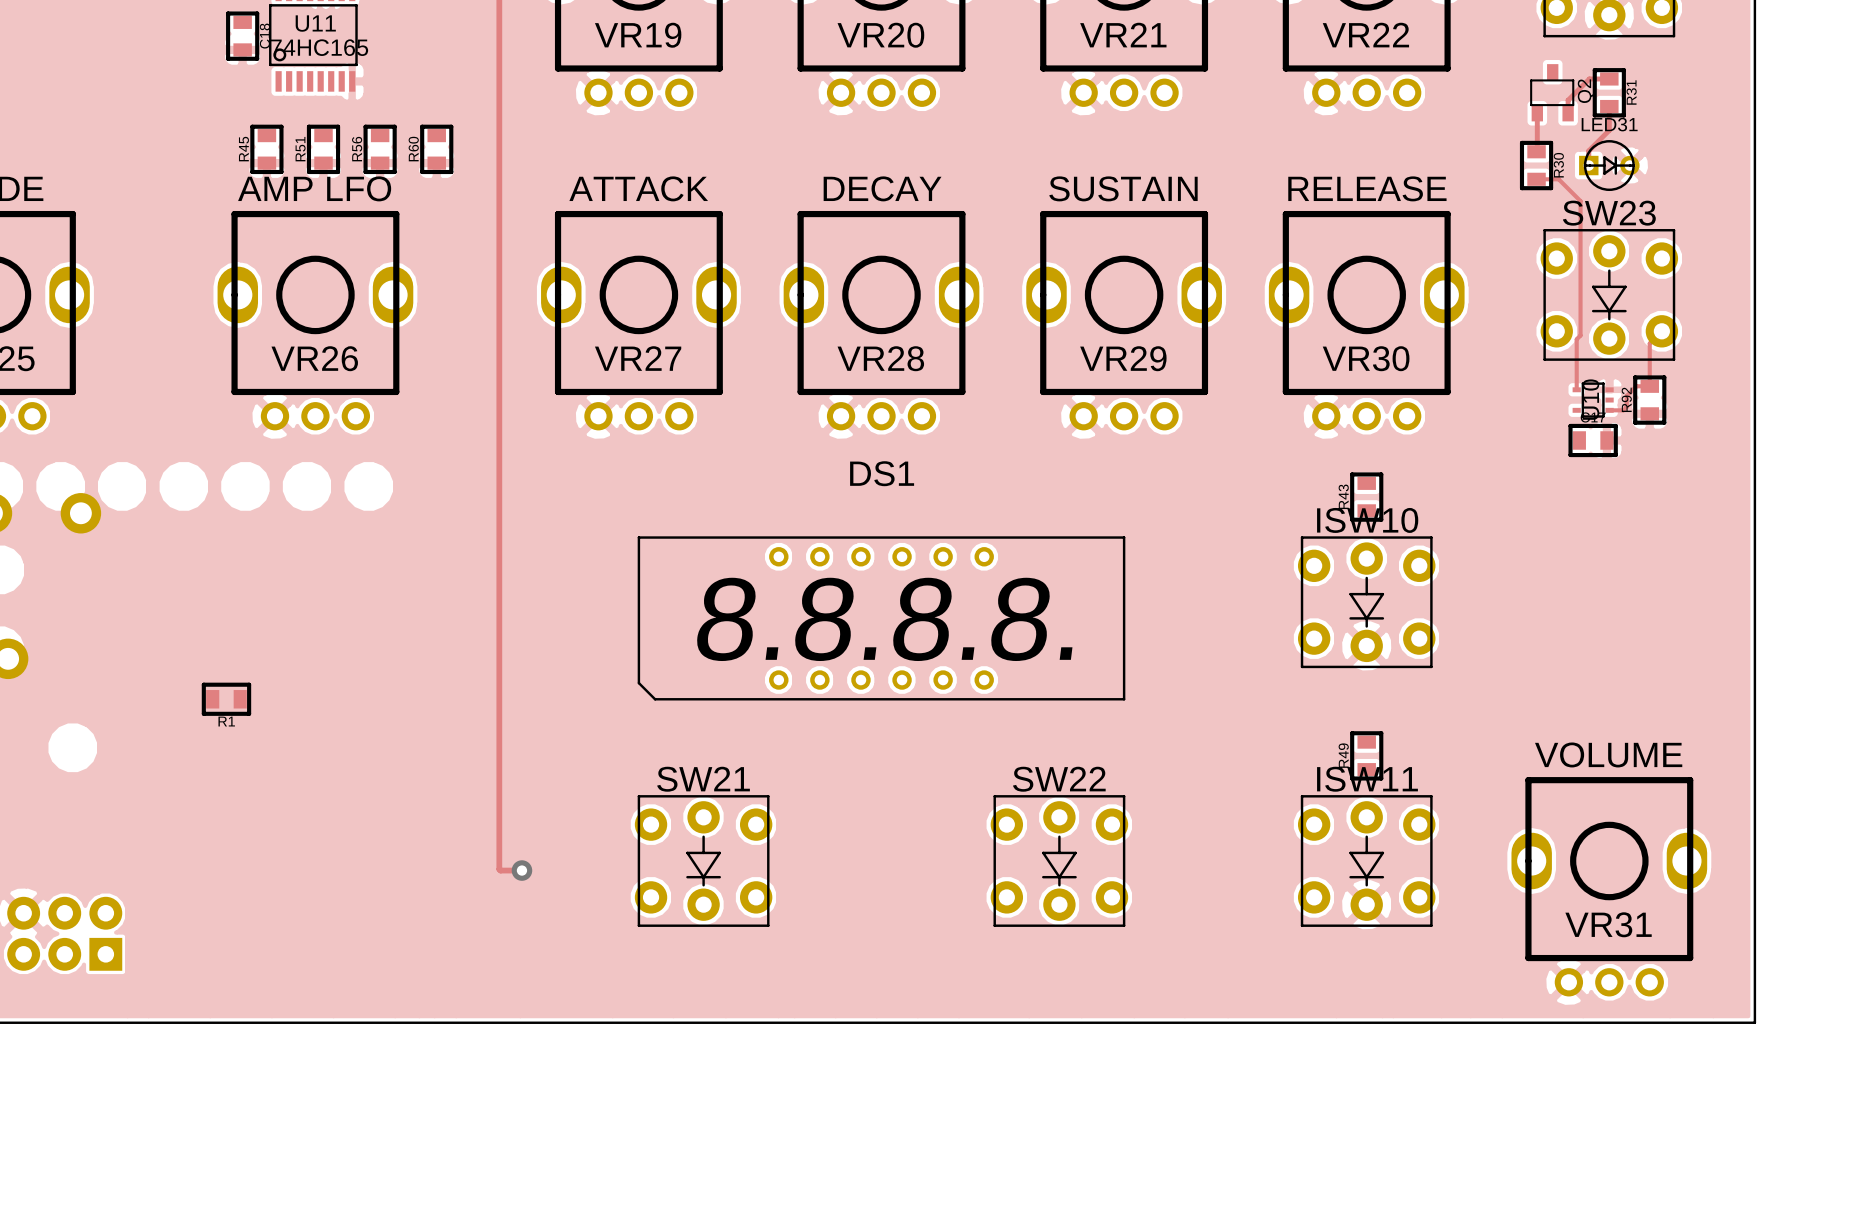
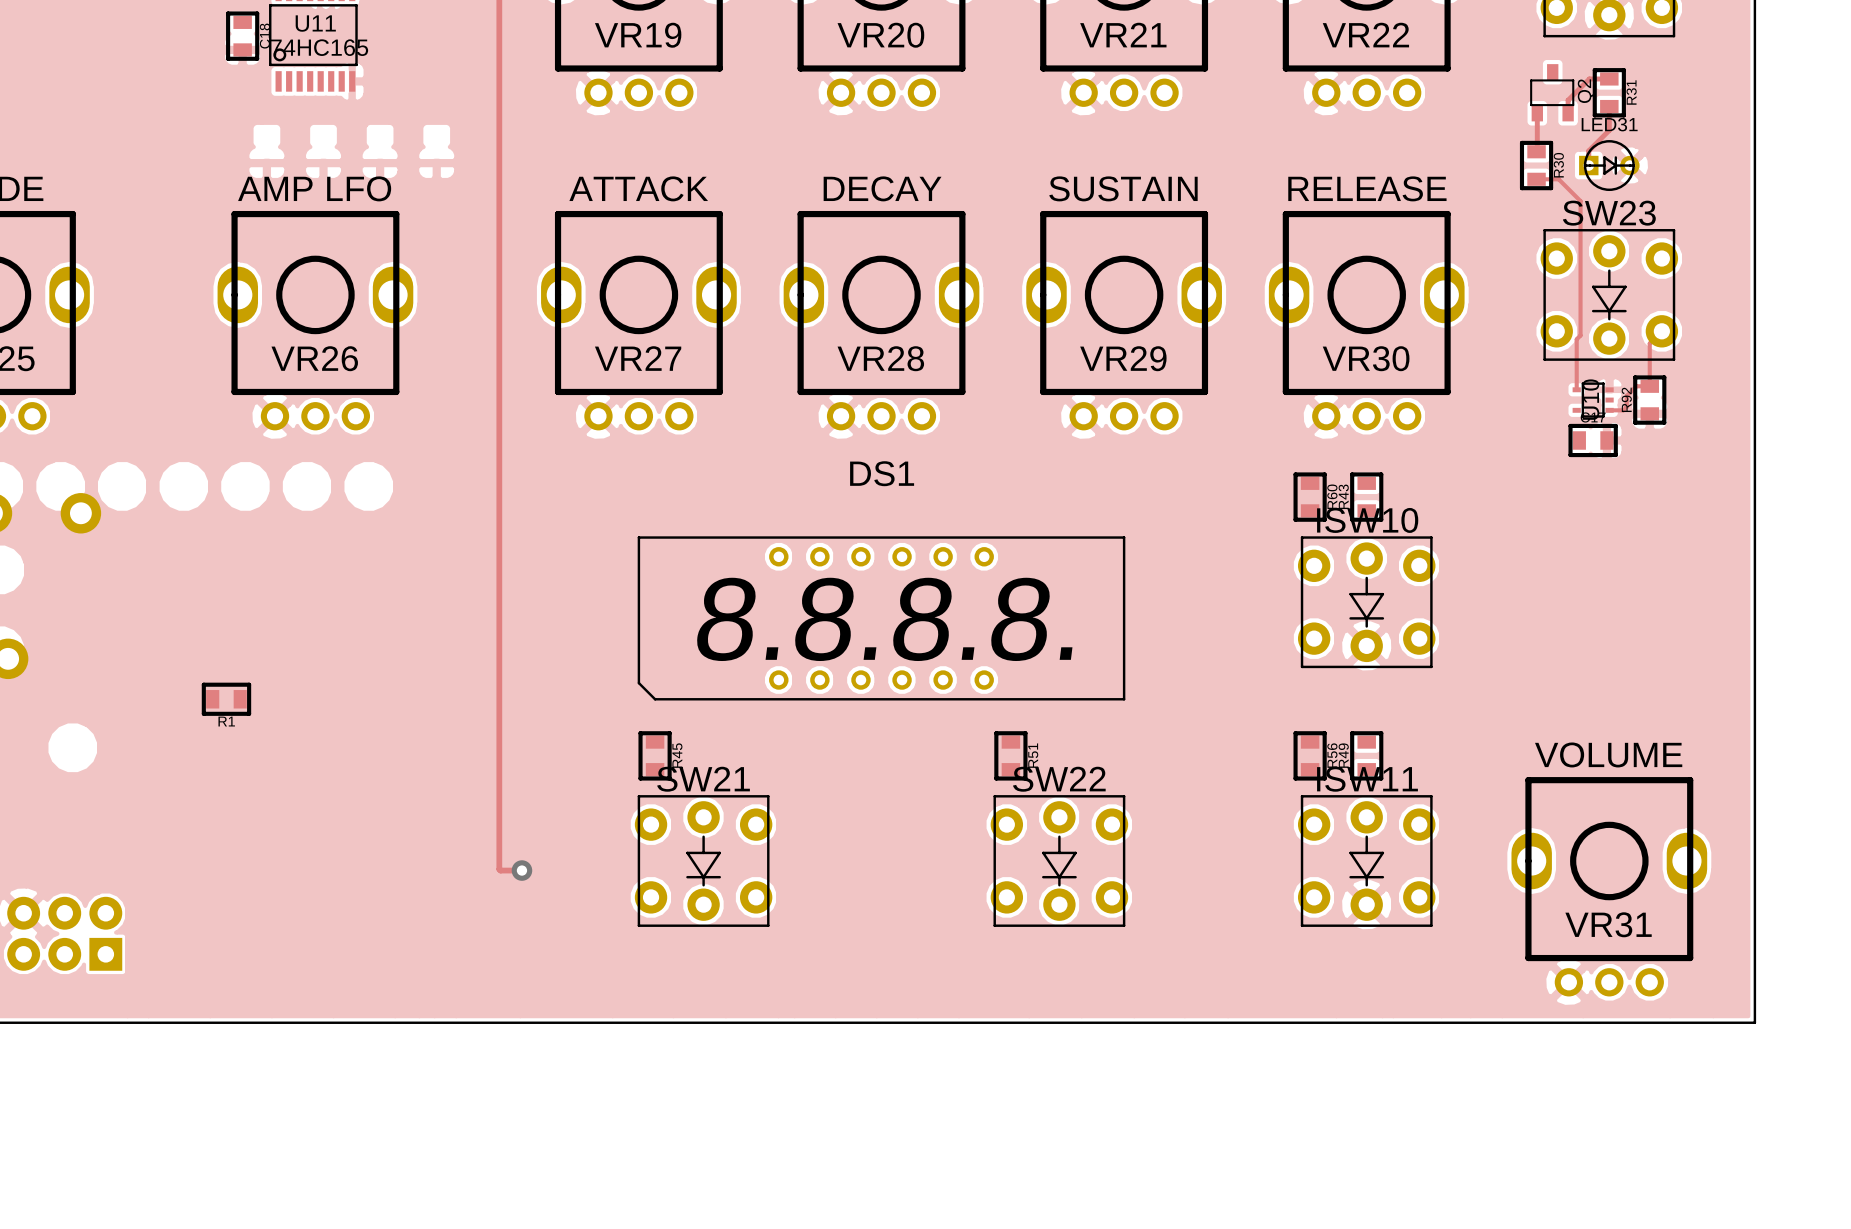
R45 name position: R45 (243, 149) -> R45 (677, 755)
R45 position: (266, 149) -> (655, 755)
R51 name position: R51 (300, 149) -> R51 (1033, 755)
R51 position: (323, 149) -> (1010, 755)
R56 name position: R56 (357, 149) -> R56 (1332, 755)
R56 position: (380, 149) -> (1310, 755)
R60 name position: R60 (413, 149) -> R60 (1332, 496)
R60 position: (436, 149) -> (1310, 497)

